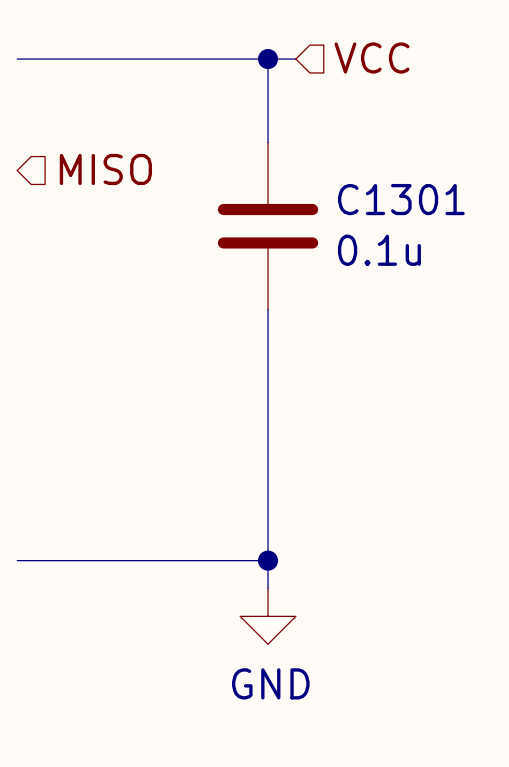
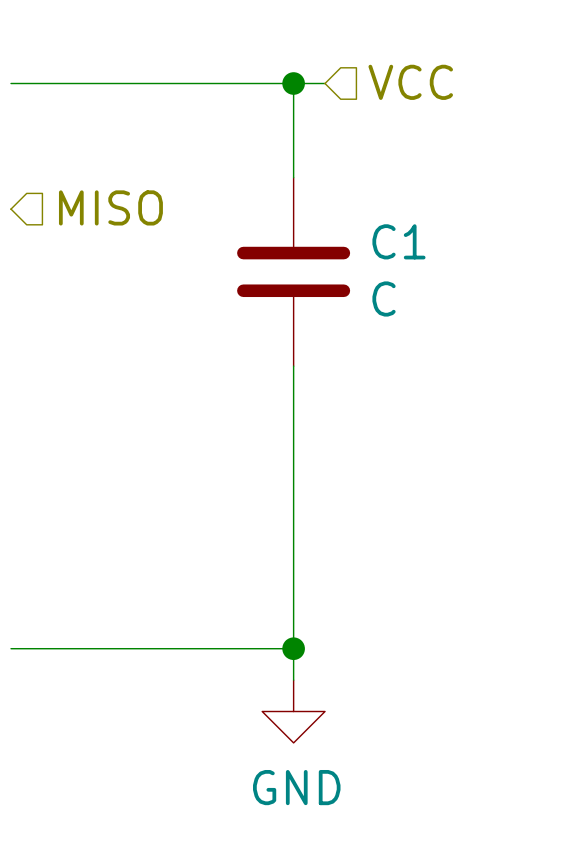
C1301 name: C1301 (401, 199) -> C1 (398, 241)
C1301 value: 0.1u (379, 250) -> C (384, 298)

